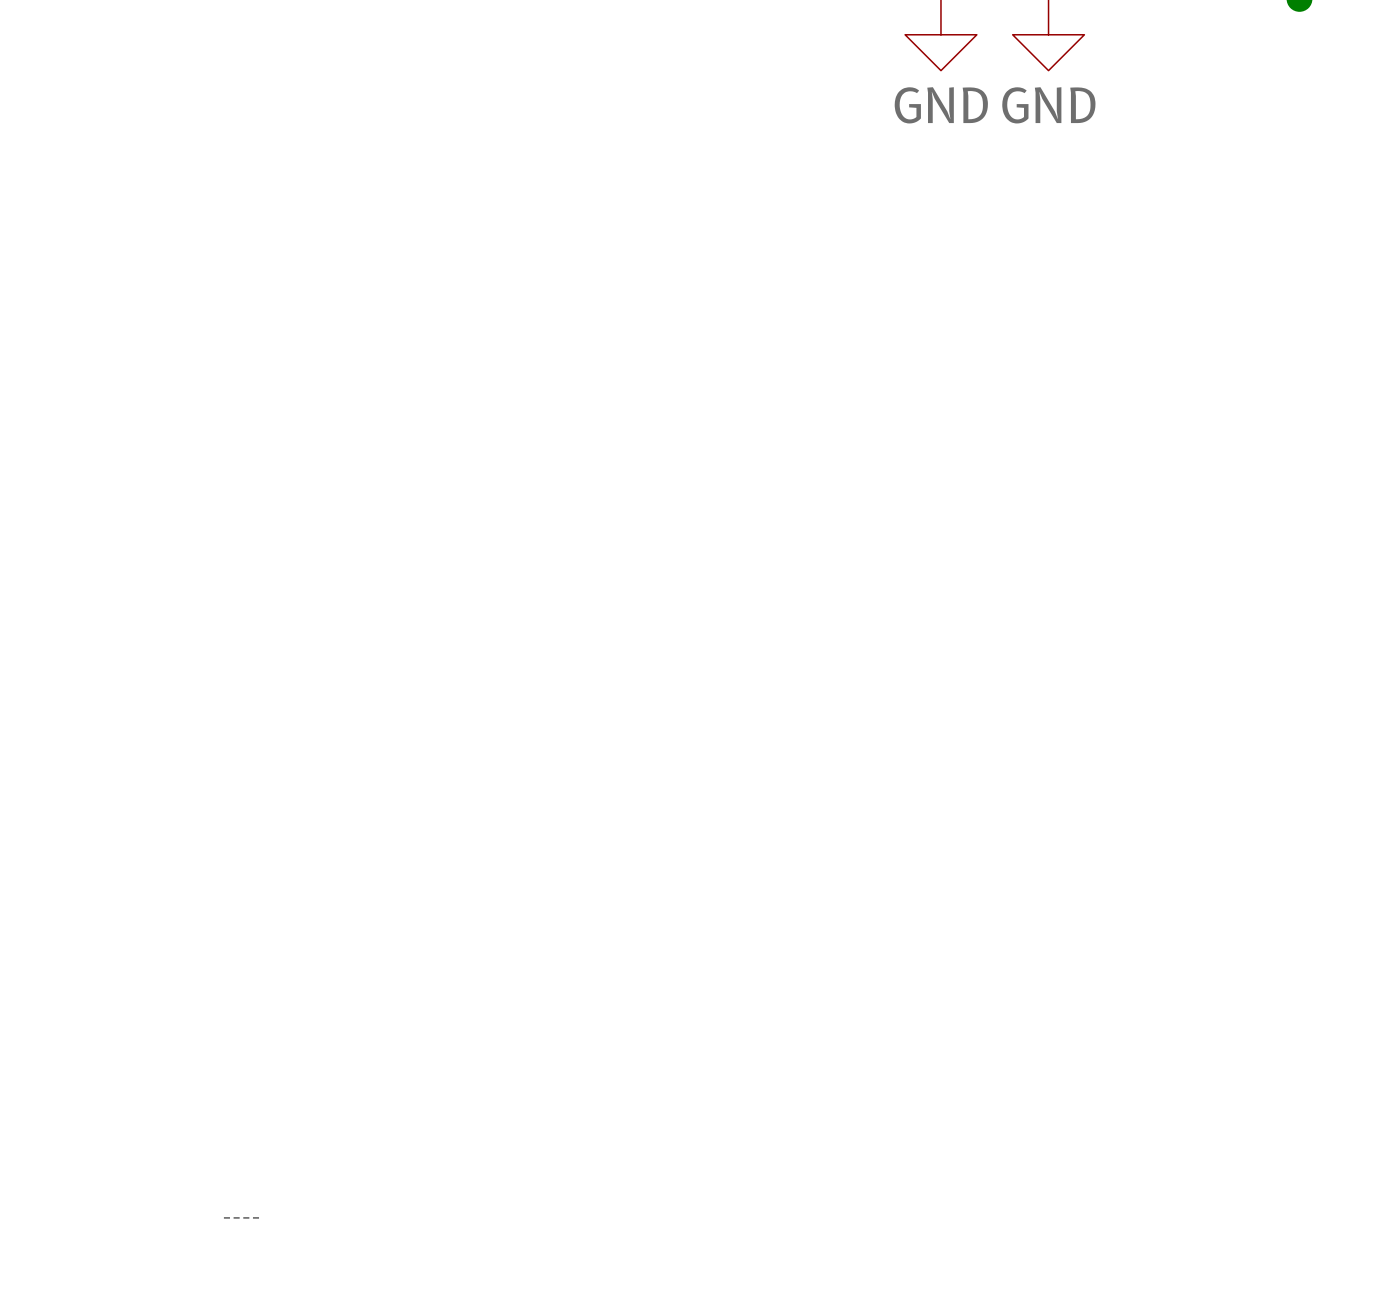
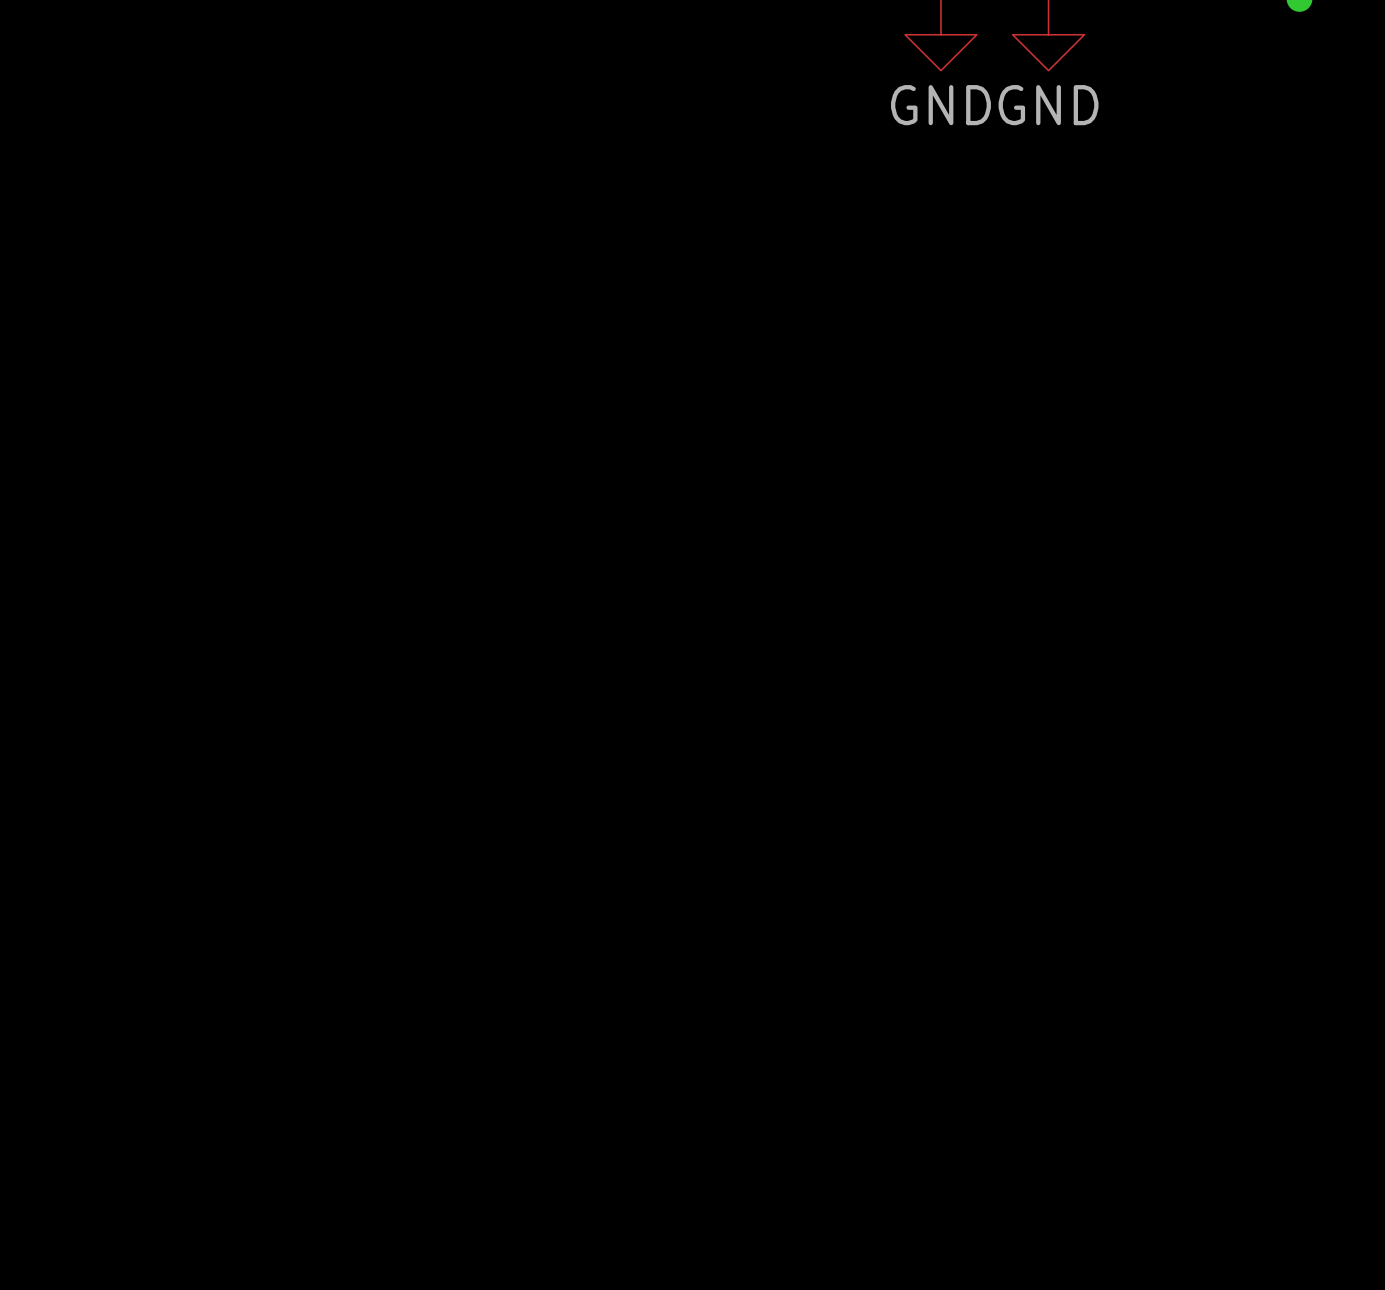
line: (223, 1217) (259, 1217) -> none

